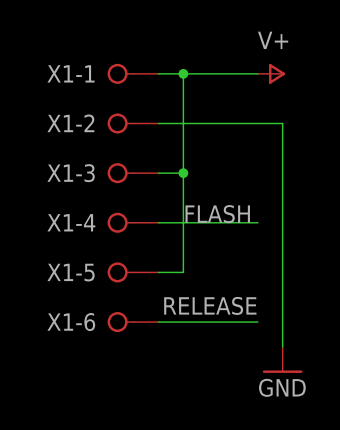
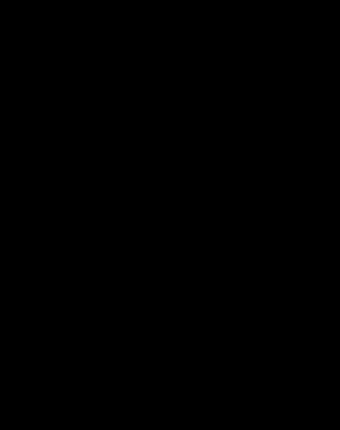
X1-1: (133, 73) -> none
wire: (158, 73) (257, 73) -> none
wire: (183, 73) (183, 272) (158, 272) -> none
junction: (183, 73) -> none
power symbol: V+ (271, 73) -> none
X1-2: (133, 123) -> none
wire: (158, 123) (282, 123) (282, 346) -> none
X1-3: (133, 173) -> none
wire: (158, 173) (183, 173) -> none
junction: (183, 173) -> none
label: FLASH (217, 214) -> none
X1-4: (133, 222) -> none
wire: (158, 222) (257, 222) -> none
X1-5: (133, 272) -> none
label: RELEASE (210, 305) -> none
X1-6: (133, 322) -> none
wire: (158, 322) (257, 322) -> none
power symbol: GND (282, 359) -> none

